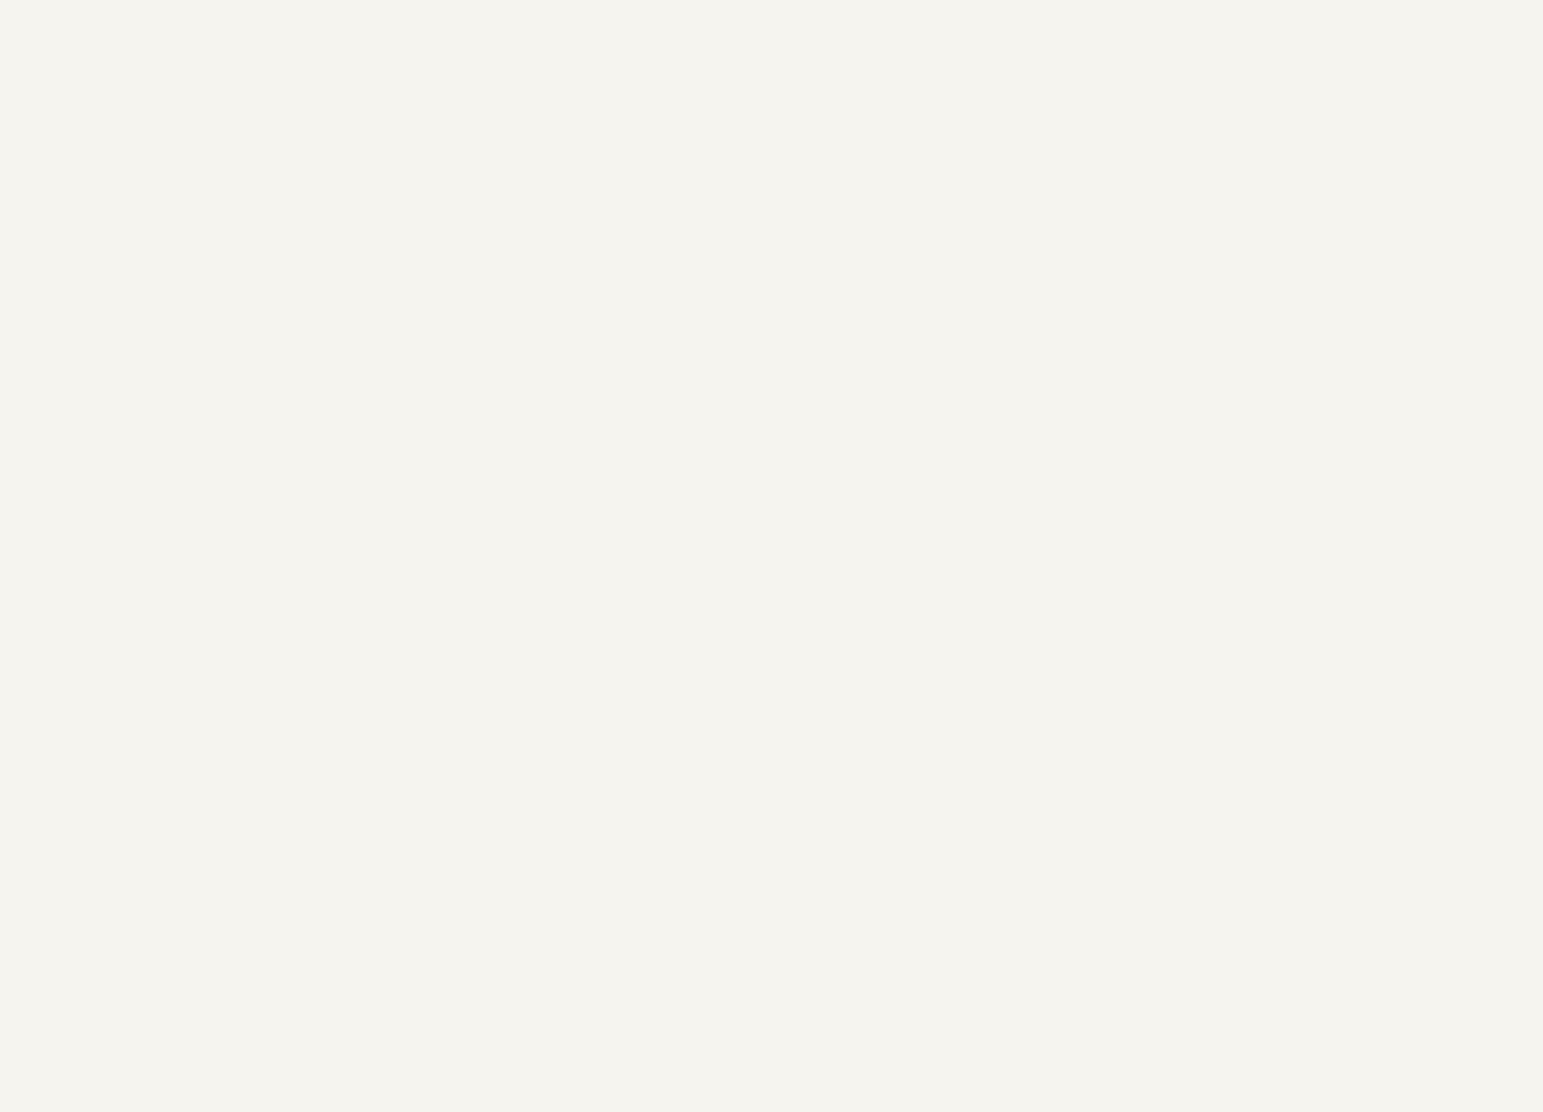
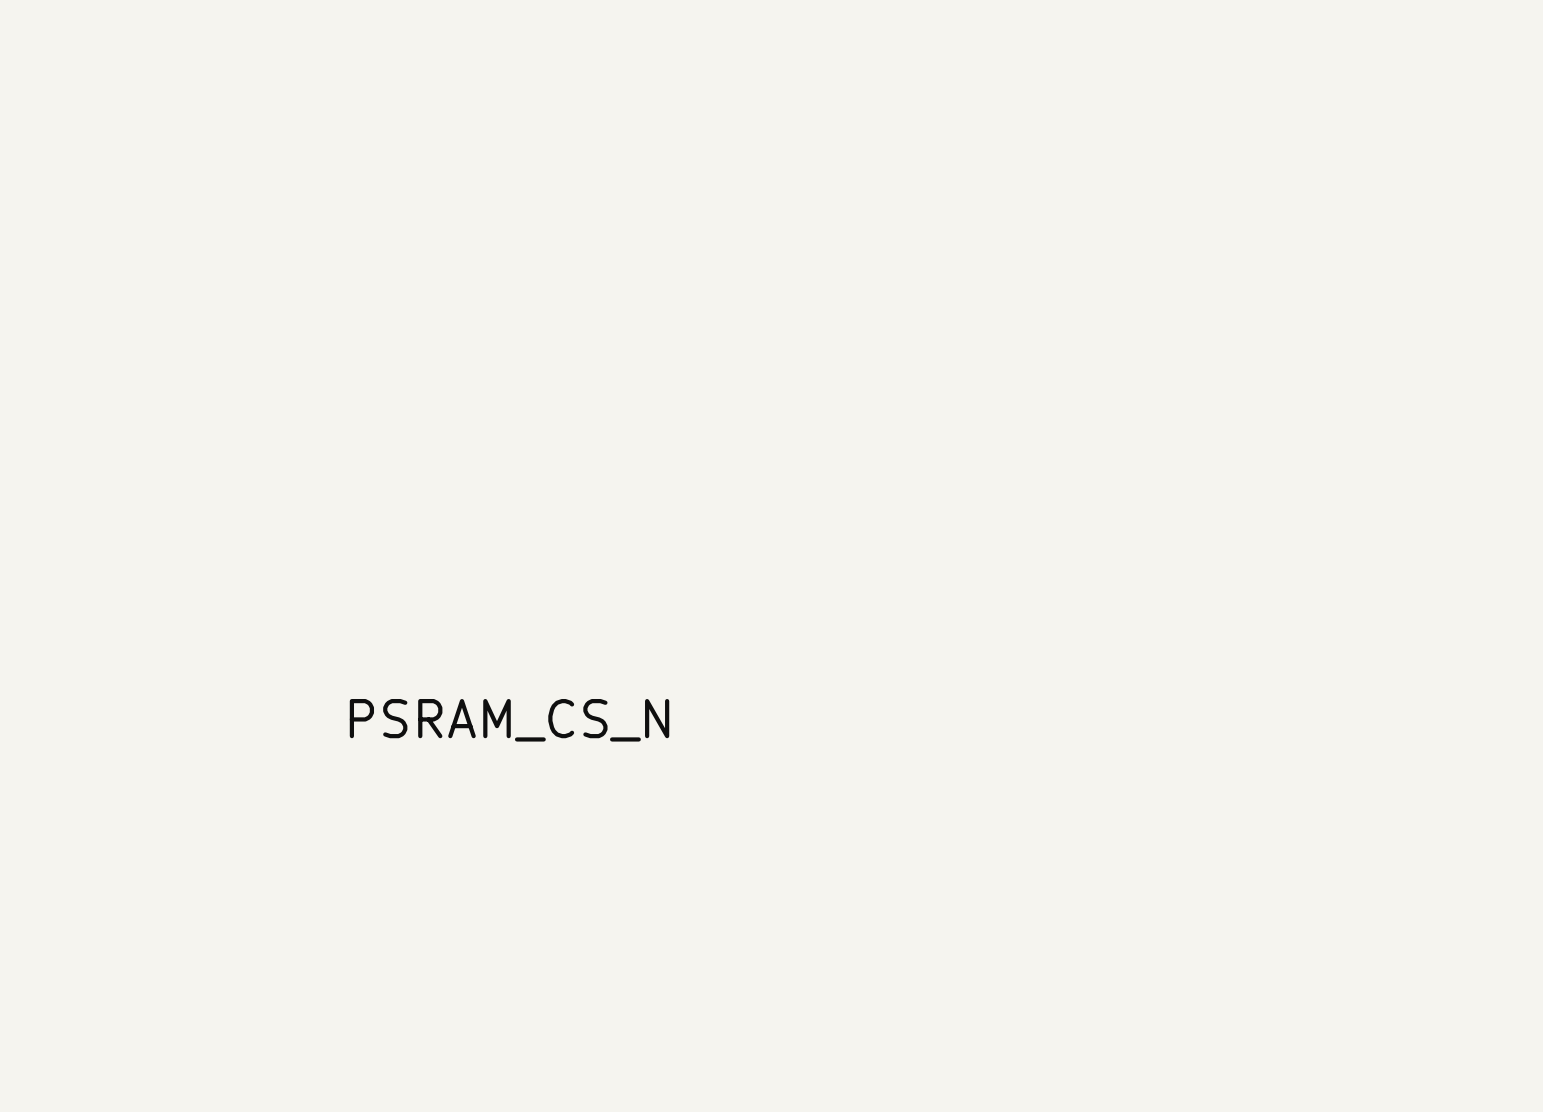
label: none -> PSRAM_CS_N (509, 720)

